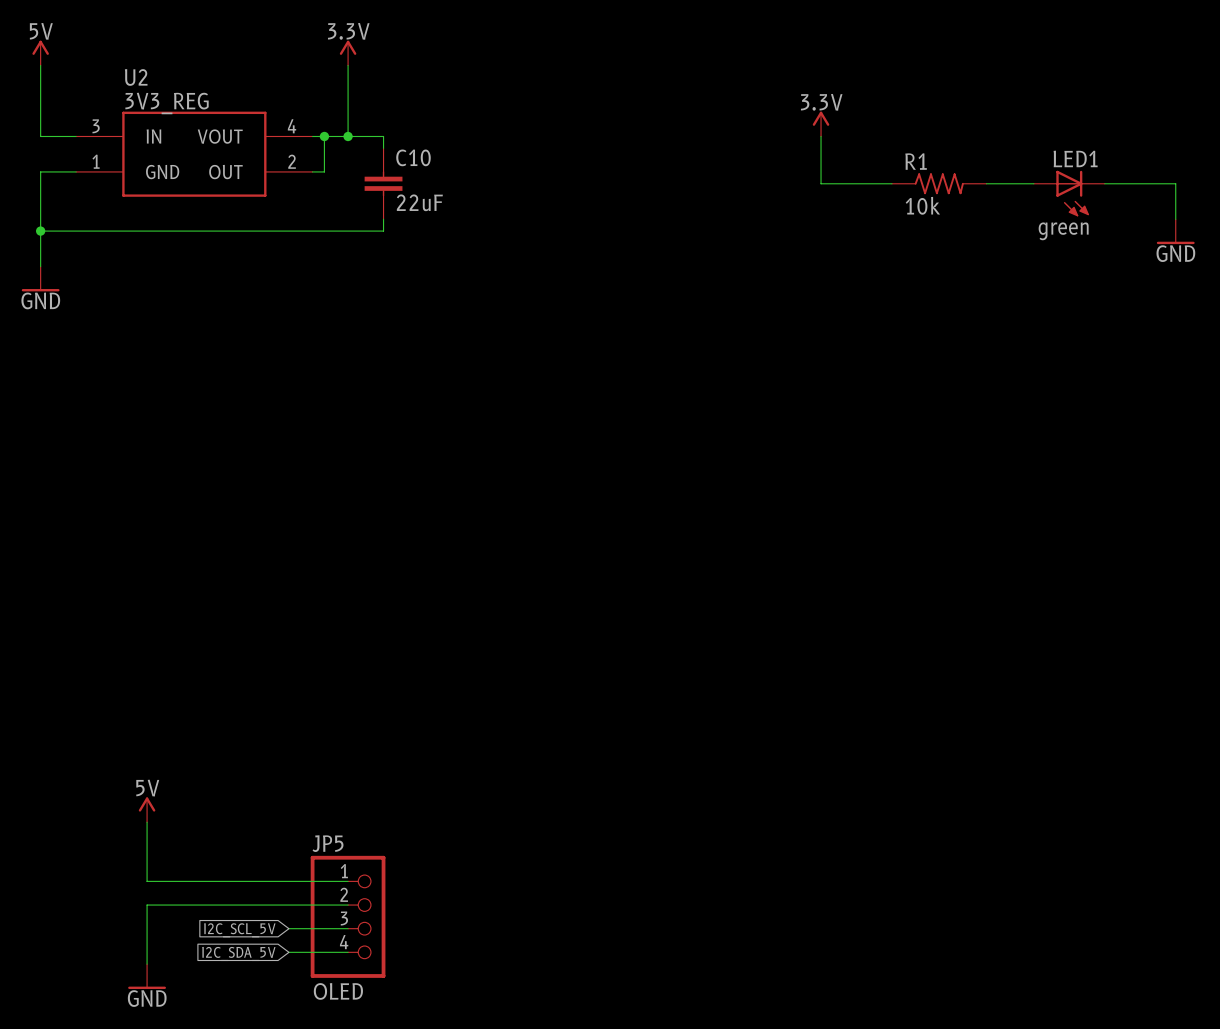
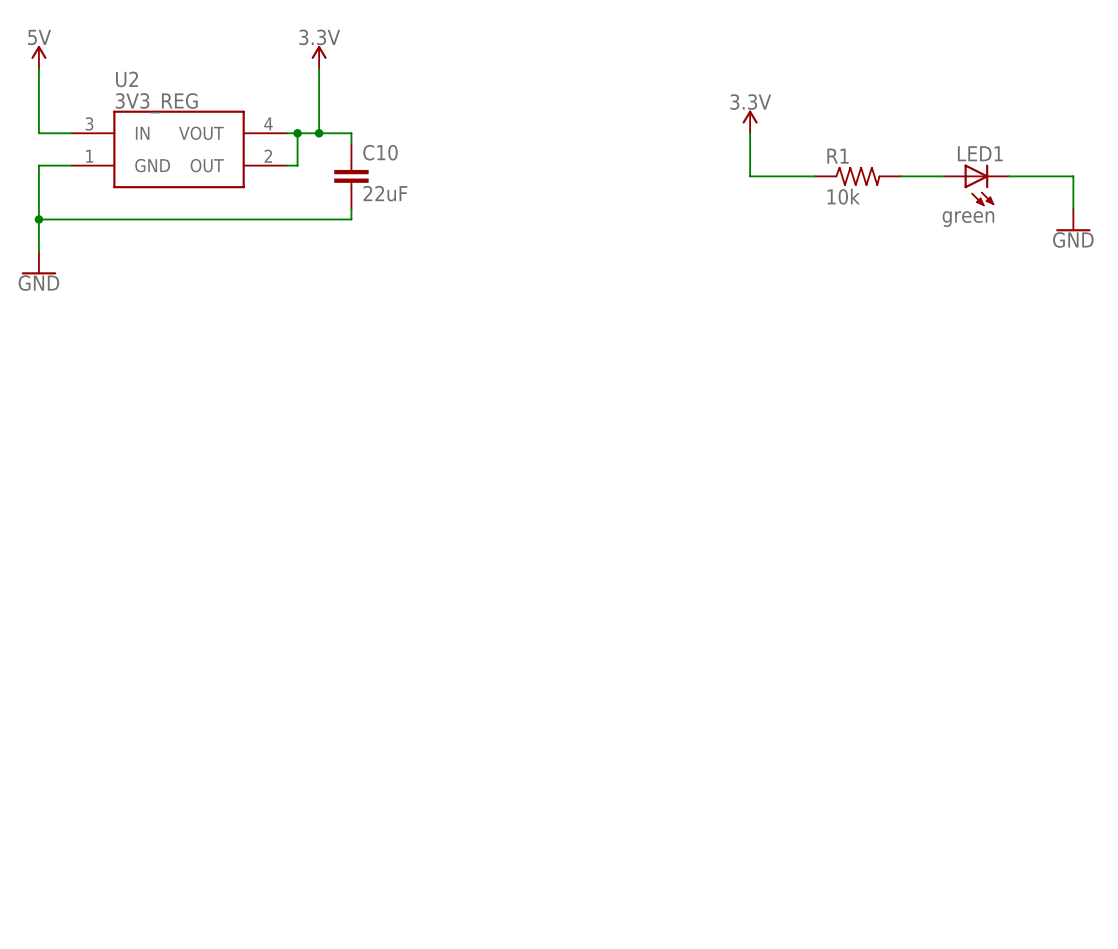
power symbol: 5V (147, 809) -> none
wire: (147, 822) (147, 881) (348, 881) -> none
wire: (348, 905) (147, 905) (147, 964) -> none
JP5: OLED (348, 916) -> none
wire: (288, 928) (348, 928) -> none
global label: I2C_SCL_5V (239, 930) -> none
wire: (288, 952) (348, 952) -> none
global label: I2C_SDA_5V (238, 953) -> none
power symbol: GND (147, 976) -> none

